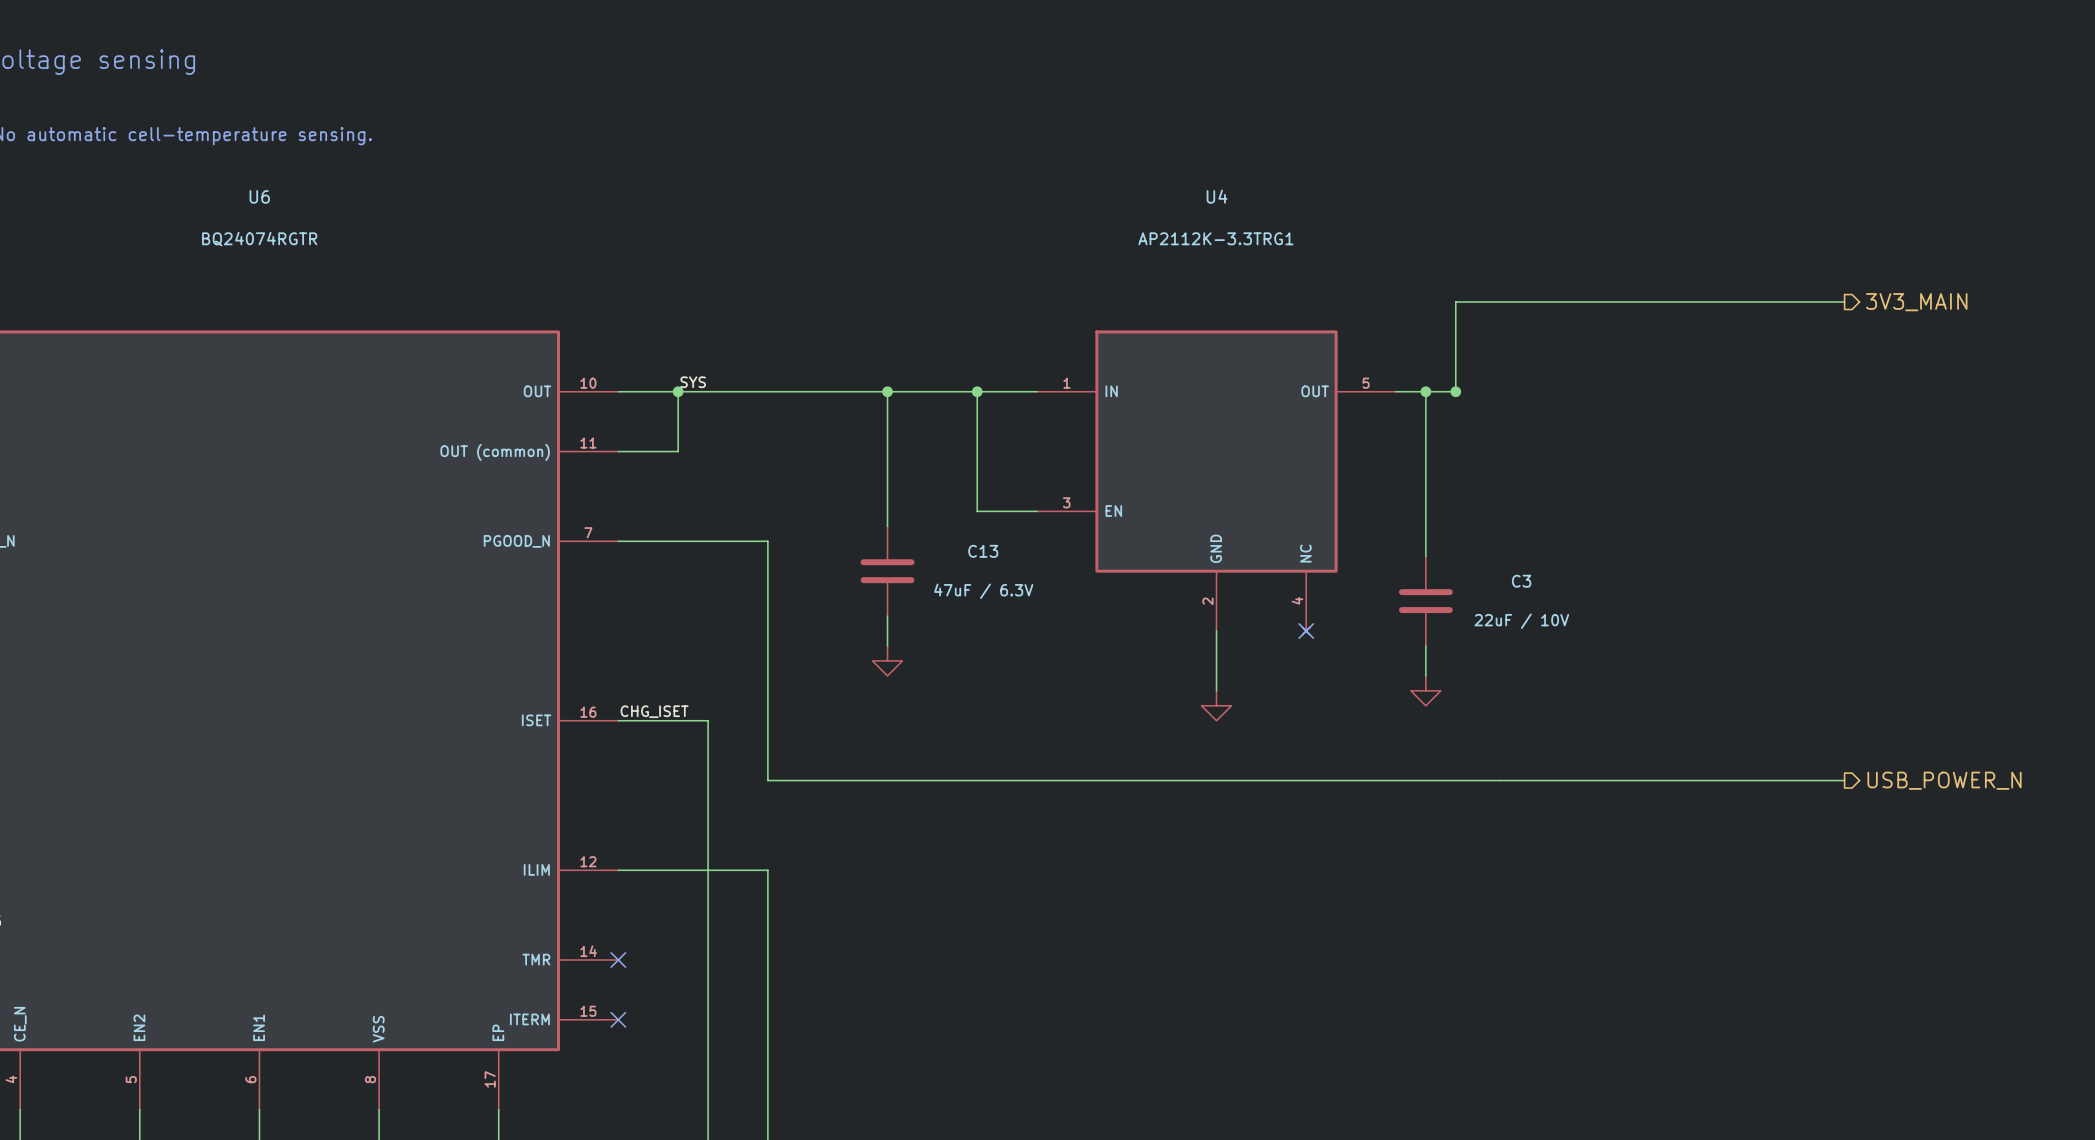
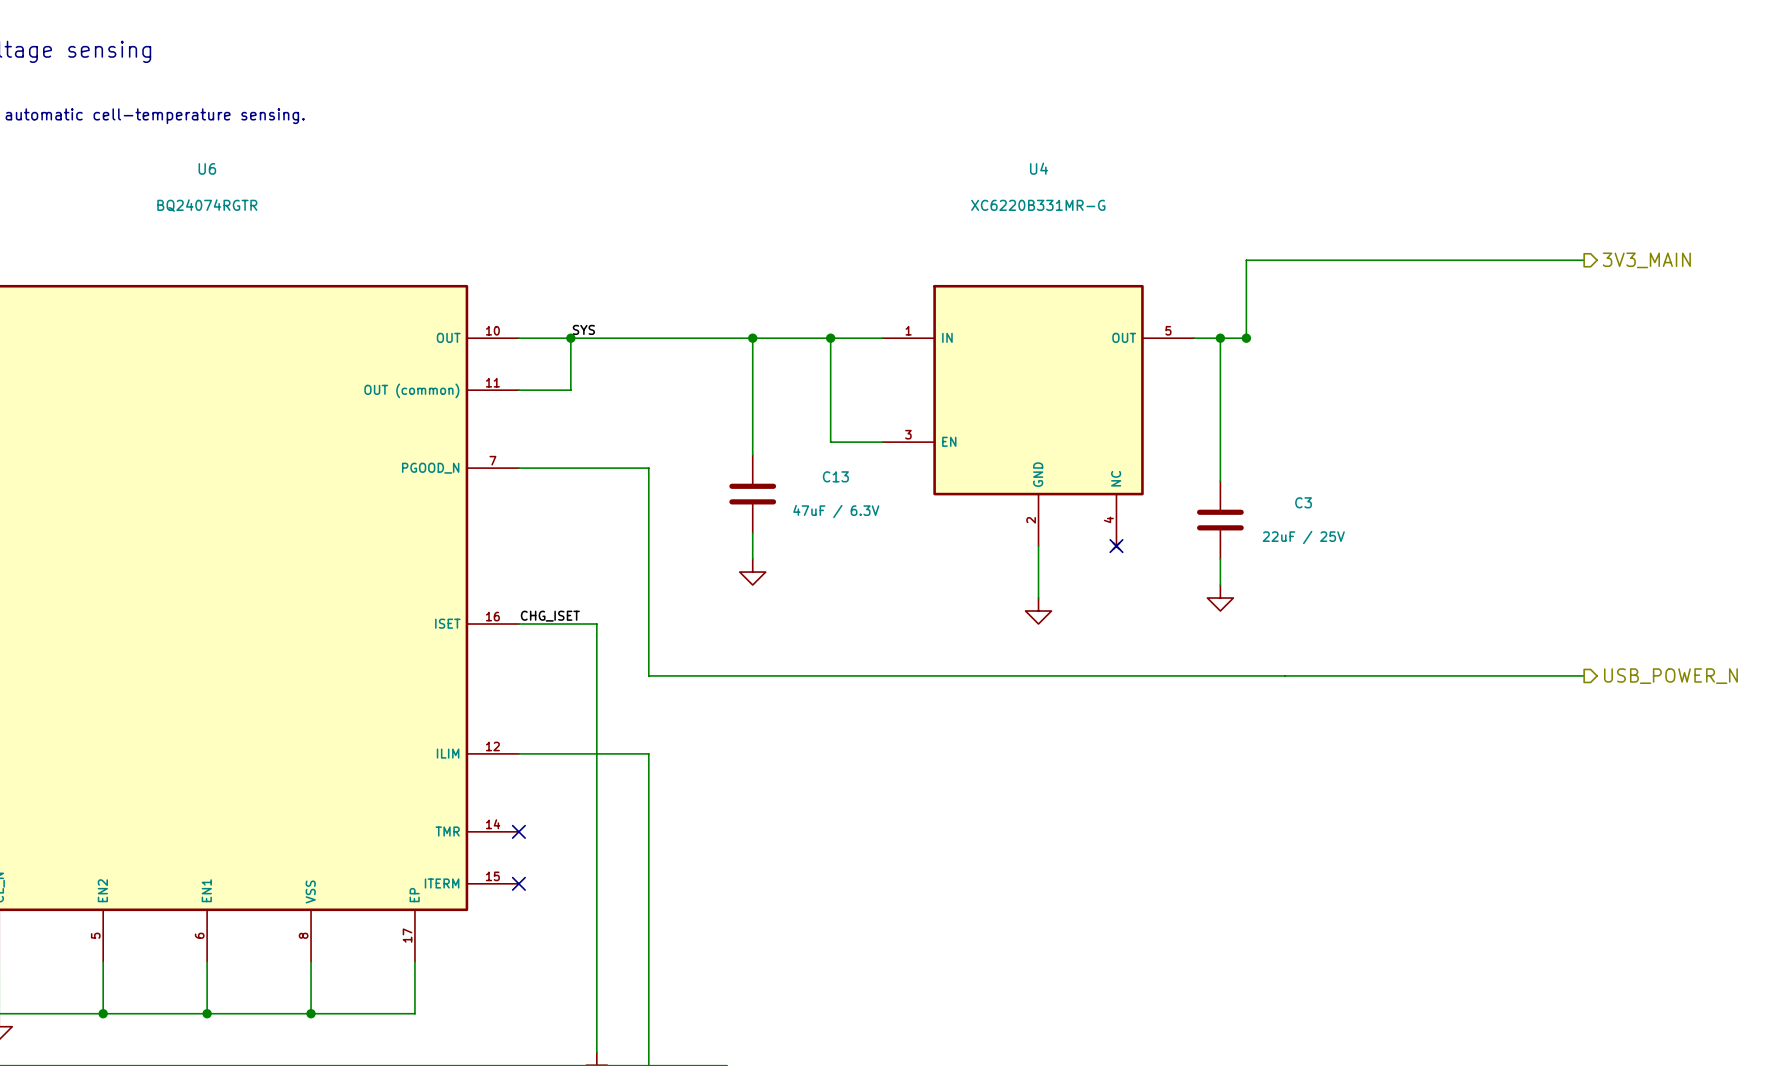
U4 value: AP2112K-3.3TRG1 (1215, 238) -> XC6220B331MR-G (1038, 205)
C3 value: 22uF / 10V (1521, 621) -> 22uF / 25V (1303, 537)

